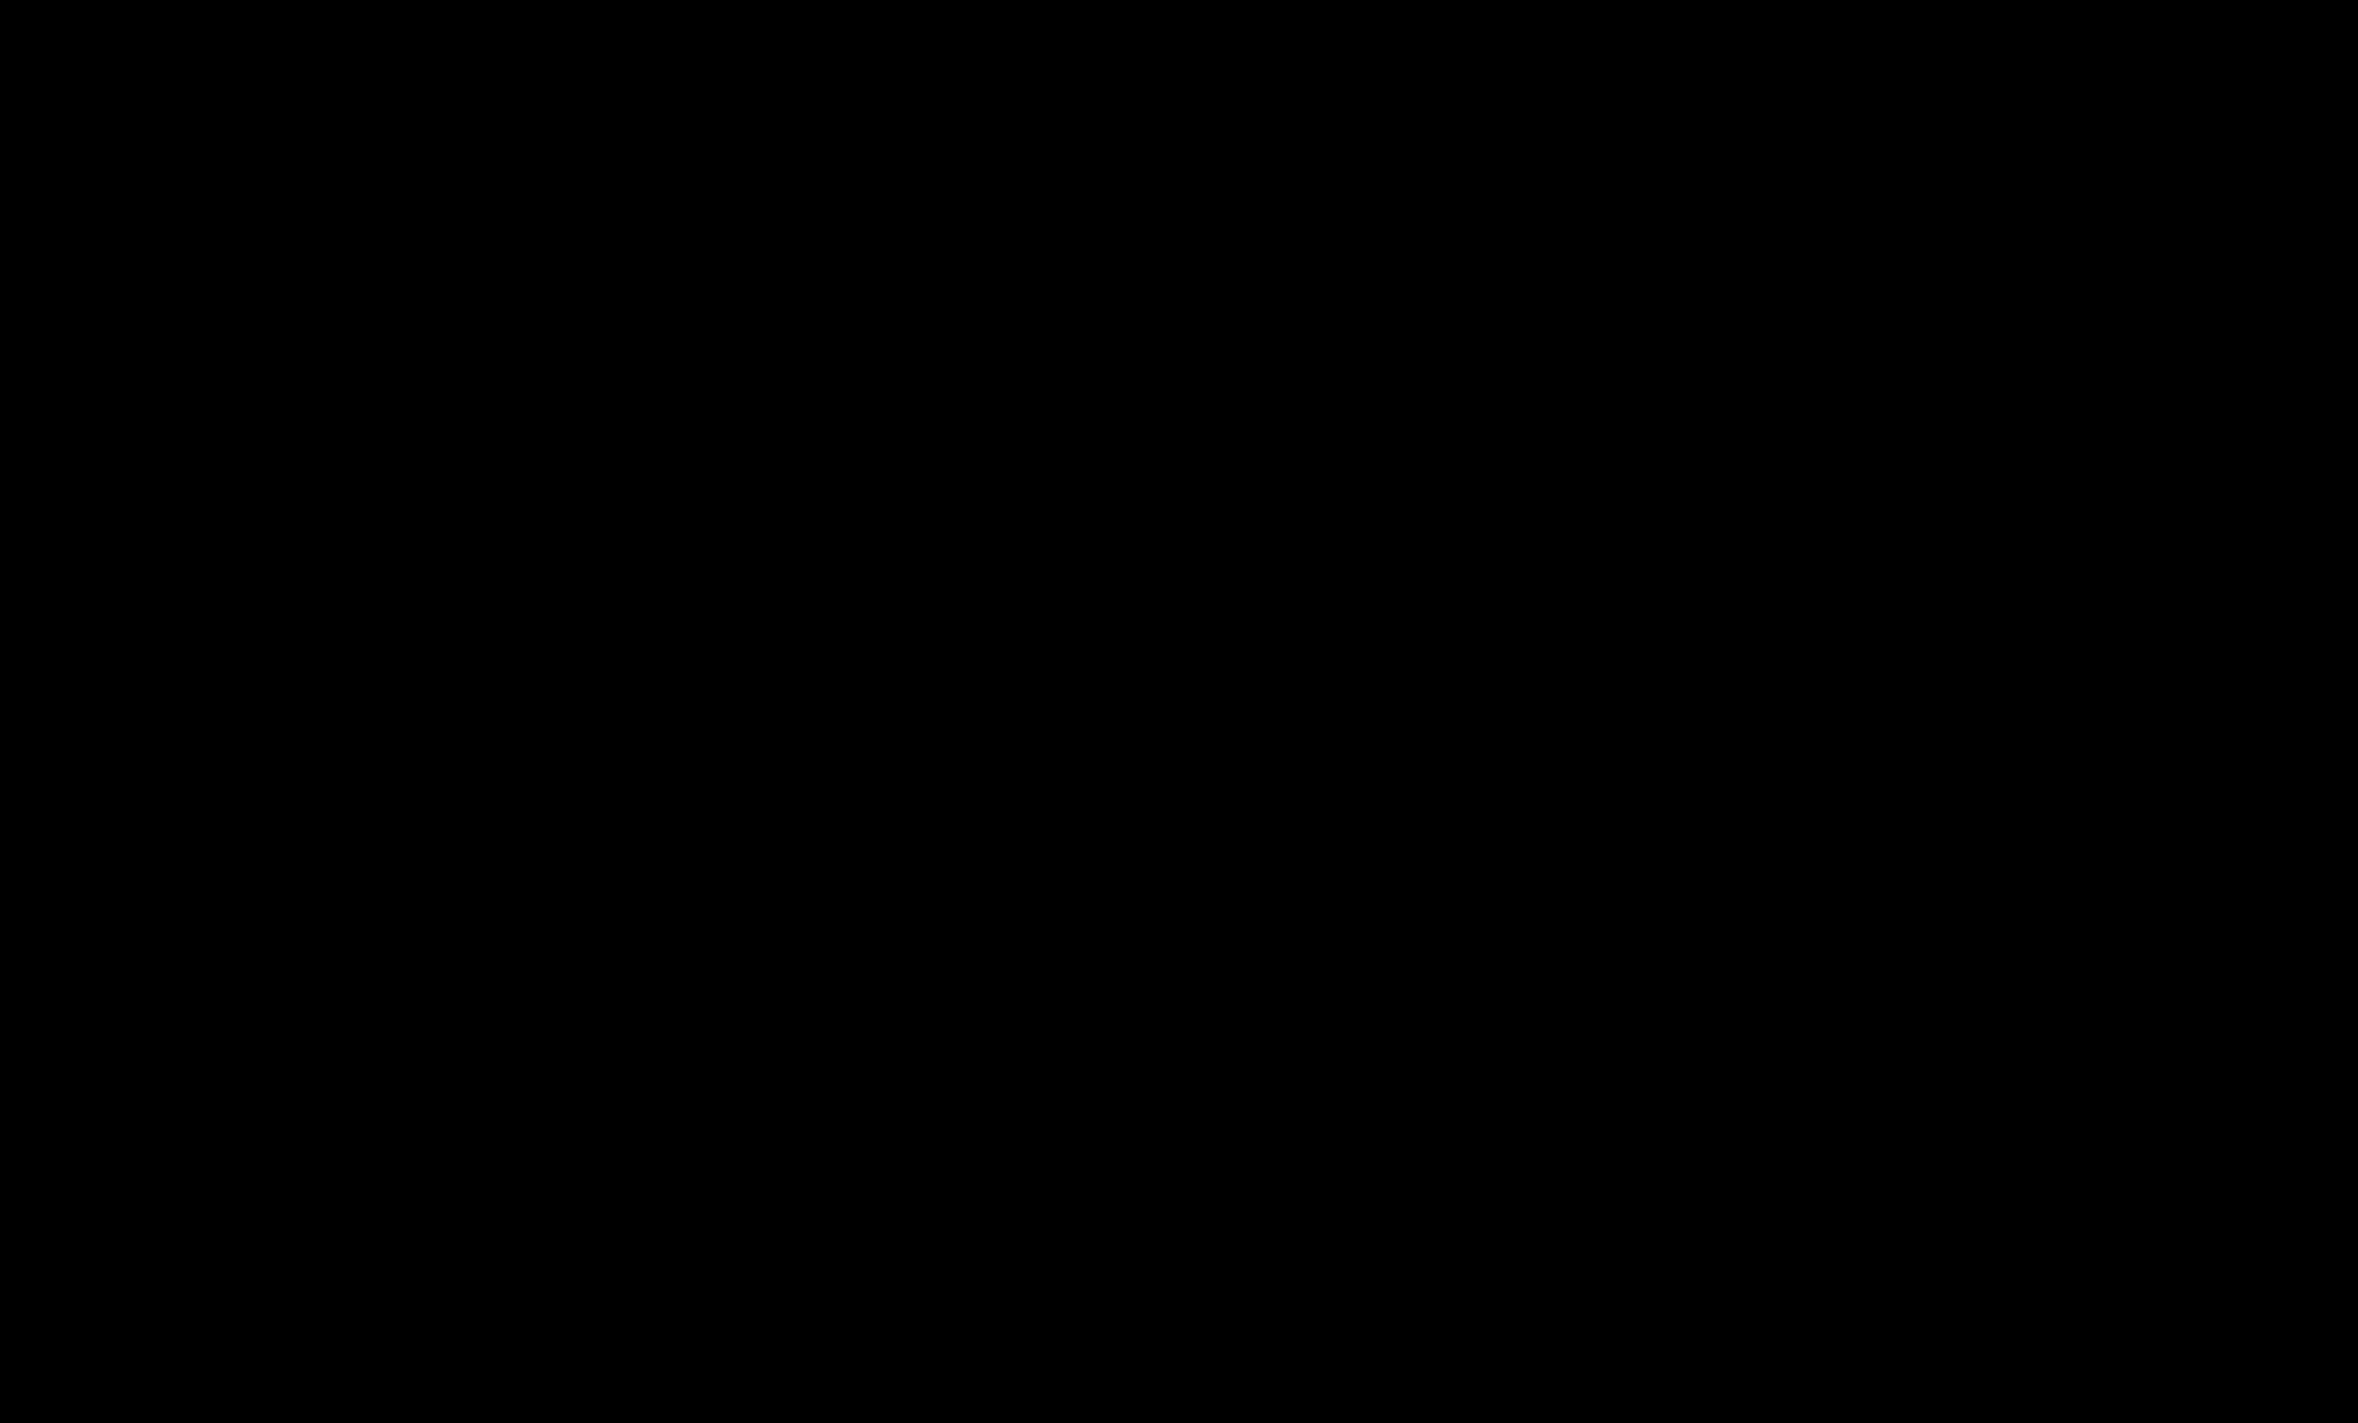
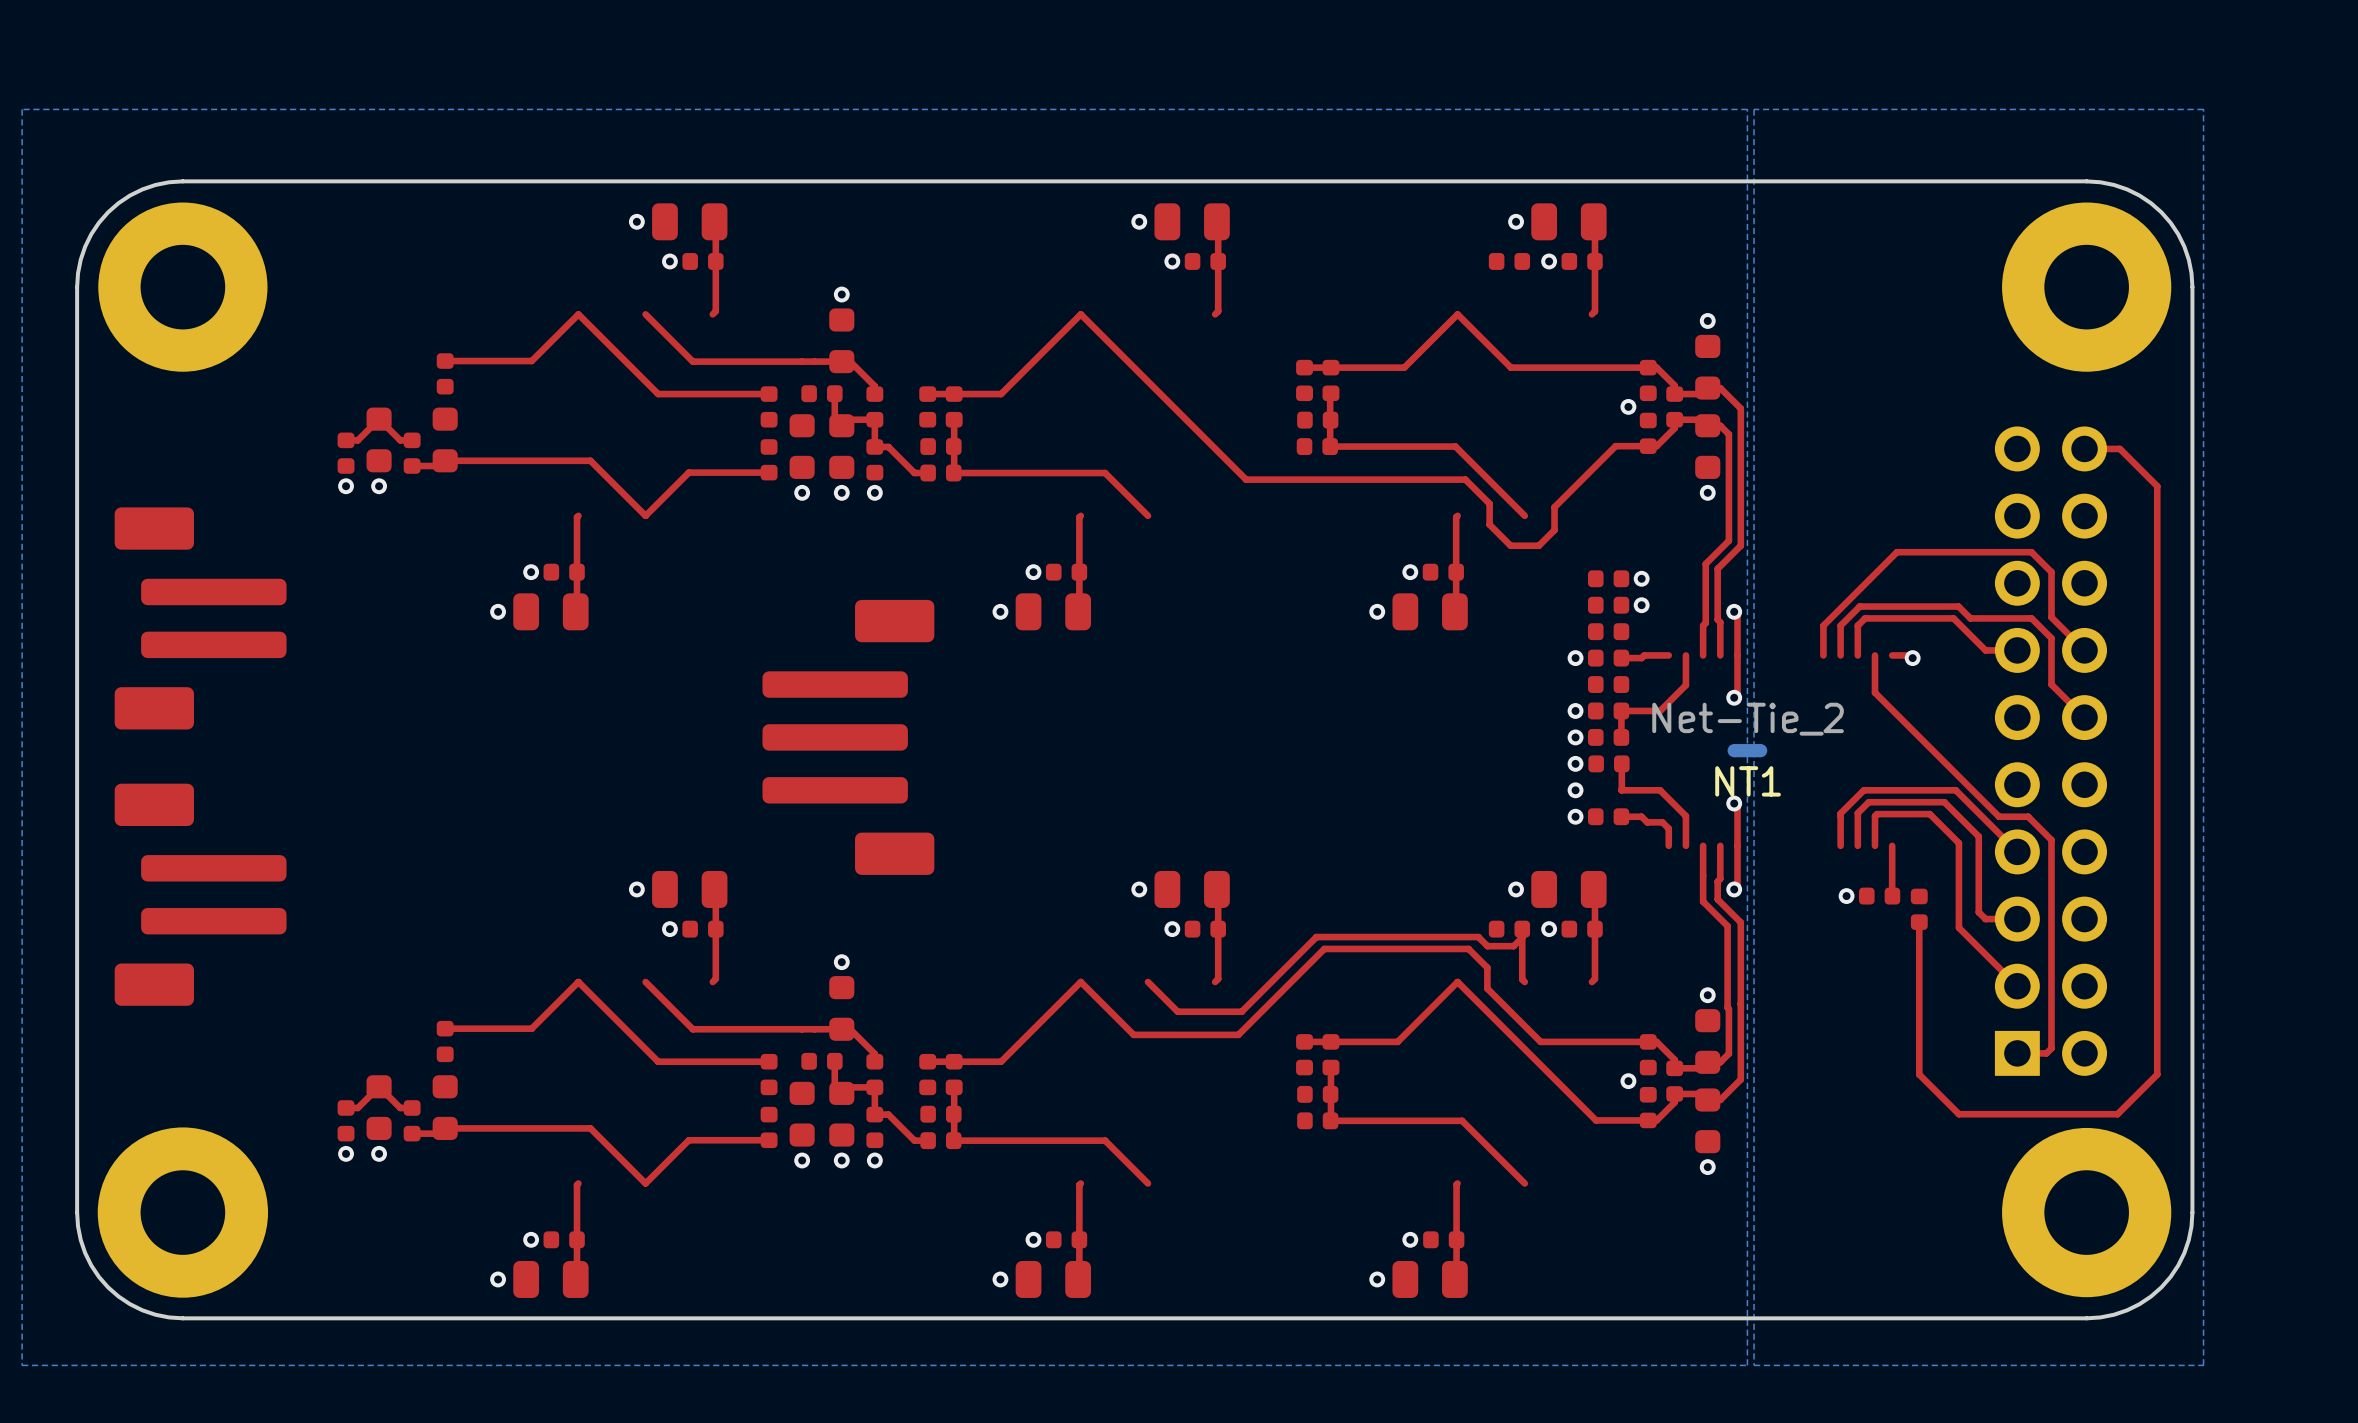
bottom zone outline: none -> (1747, 109) (22, 109) (22, 1365) (1747, 1365) (1747, 109)
bottom zone outline: none -> (2203, 109) (2203, 1365) (1754, 1365) (1754, 109) (2203, 109)
via: none -> (636, 221)
part: none -> (689, 221)
top track: none -> (714, 221) (715, 311) (712, 314)
via: none -> (1139, 221)
part: none -> (1192, 221)
top track: none -> (1216, 221) (1218, 311) (1215, 314)
via: none -> (1516, 221)
part: none -> (1568, 221)
top track: none -> (1593, 221) (1594, 311) (1591, 314)
via: none -> (669, 261)
part: none -> (702, 261)
via: none -> (1172, 261)
part: none -> (1205, 261)
part: none -> (1509, 261)
via: none -> (1549, 261)
part: none -> (1582, 261)
via: none -> (841, 294)
top track: none -> (645, 314) (692, 361) (850, 361) (874, 386) (874, 394)
via: none -> (1707, 320)
part: none -> (841, 340)
top track: none -> (445, 361) (531, 361) (578, 314) (658, 394) (769, 394)
top track: none -> (1304, 367) (1404, 367) (1457, 314) (1510, 367) (1656, 367) (1674, 385) (1674, 394) (1701, 394) (1707, 388) (1720, 388) (1740, 408) (1740, 545) (1717, 568) (1717, 619) (1720, 622) (1720, 655)
part: none -> (1707, 367)
part: none -> (445, 373)
part: none -> (1304, 380)
part: none -> (1330, 380)
part: none -> (1648, 380)
part: none -> (821, 393)
top track: none -> (834, 393) (834, 418) (841, 425) (847, 419) (874, 419) (874, 446) (888, 446) (914, 473) (928, 473)
top track: none -> (1330, 393) (1330, 446) (1455, 446) (1524, 515)
top track: none -> (927, 394) (1001, 394) (1080, 314) (1246, 479) (1465, 479) (1489, 503) (1489, 524) (1510, 545) (1538, 545) (1554, 530) (1554, 507) (1615, 446) (1656, 446) (1674, 428) (1674, 419) (1701, 419) (1707, 425) (1720, 425) (1728, 434) (1728, 540) (1705, 563) (1705, 623) (1703, 625) (1703, 655)
part: none -> (769, 406)
part: none -> (874, 406)
part: none -> (927, 406)
part: none -> (954, 406)
via: none -> (1628, 406)
part: none -> (1674, 406)
top track: none -> (954, 419) (953, 473) (1105, 473) (1147, 515)
part: none -> (1317, 420)
part: none -> (1648, 433)
part: none -> (379, 439)
part: none -> (445, 439)
top track: none -> (412, 440) (400, 440) (379, 419) (357, 440) (346, 440)
part: none -> (802, 446)
part: none -> (841, 446)
part: none -> (940, 446)
part: none -> (1317, 446)
part: none -> (1707, 446)
top track: none -> (2084, 448) (2119, 448) (2157, 486) (2157, 1074) (2117, 1114) (1958, 1114) (1919, 1074) (1919, 922)
part: none -> (346, 453)
part: none -> (412, 453)
part: none -> (769, 459)
part: none -> (874, 459)
top track: none -> (412, 466) (439, 466) (445, 460) (590, 460) (645, 515) (688, 472) (769, 472)
part: none -> (940, 473)
via: none -> (346, 486)
via: none -> (379, 486)
via: none -> (802, 492)
via: none -> (841, 492)
via: none -> (874, 492)
via: none -> (1707, 492)
top track: none -> (578, 515) (575, 611)
top track: none -> (1080, 515) (1078, 611)
top track: none -> (1457, 515) (1454, 611)
via: none -> (531, 572)
part: none -> (564, 572)
via: none -> (1033, 572)
part: none -> (1066, 572)
via: none -> (1410, 572)
part: none -> (1443, 572)
part: none -> (1608, 578)
via: none -> (1641, 578)
part: none -> (1608, 605)
via: none -> (1641, 605)
via: none -> (498, 611)
part: none -> (550, 611)
via: none -> (1000, 611)
part: none -> (1053, 611)
via: none -> (1377, 611)
part: none -> (1430, 611)
top track: none -> (1734, 611) (1737, 615) (1737, 694) (1734, 697)
via: none -> (1734, 611)
part: none -> (200, 618)
part: none -> (1608, 631)
top track: none -> (2017, 650) (1985, 650) (1953, 618) (1865, 618) (1857, 625) (1857, 655)
top track: none -> (2084, 650) (2051, 617) (2051, 572) (2031, 552) (1896, 552) (1823, 625) (1823, 655)
top track: none -> (1668, 655) (1621, 658)
top track: none -> (1685, 655) (1685, 685) (1660, 710) (1621, 710) (1621, 737)
top track: none -> (1840, 655) (1840, 625) (1859, 606) (1958, 606) (1970, 618) (2031, 618) (2051, 638) (2051, 684) (2084, 717)
top track: none -> (1875, 655) (1875, 692) (1999, 816) (2028, 816) (2051, 840) (2051, 1048) (2046, 1053) (2017, 1053)
top track: none -> (1892, 655) (1910, 655) (1912, 658)
via: none -> (1575, 658)
part: none -> (1608, 658)
via: none -> (1912, 658)
part: none -> (1608, 684)
via: none -> (1734, 697)
via: none -> (1575, 710)
part: none -> (1608, 710)
part: none -> (848, 737)
via: none -> (1575, 737)
part: none -> (1608, 737)
part: none -> (1134, 749)
NT1: none -> Net-Tie_2 (1747, 750)
part: none -> (2050, 751)
via: none -> (1575, 763)
part: none -> (1609, 763)
top track: none -> (1621, 763) (1621, 790) (1660, 790) (1685, 816) (1685, 845)
via: none -> (1575, 790)
top track: none -> (1734, 803) (1737, 806) (1737, 886) (1734, 889)
via: none -> (1734, 803)
via: none -> (1575, 816)
part: none -> (1608, 816)
top track: none -> (1621, 816) (1641, 816) (1647, 822) (1662, 822) (1668, 828) (1668, 845)
top track: none -> (1703, 845) (1703, 901) (1727, 926) (1728, 1053) (1720, 1062) (1707, 1062) (1701, 1068) (1674, 1068) (1674, 1059) (1656, 1041) (1540, 1041) (1487, 988) (1487, 967) (1468, 948) (1324, 948) (1238, 1034) (1133, 1034) (1080, 982) (1001, 1061) (927, 1061)
top track: none -> (1720, 845) (1720, 878) (1717, 881) (1717, 899) (1740, 922) (1740, 1079) (1720, 1100) (1707, 1100) (1701, 1093) (1674, 1093) (1674, 1102) (1656, 1120) (1596, 1120) (1457, 982) (1397, 1041) (1304, 1041)
top track: none -> (1840, 845) (1840, 813) (1863, 790) (1955, 790) (2017, 851)
top track: none -> (1857, 845) (1857, 813) (1868, 802) (1944, 802) (1978, 836) (1978, 912) (1985, 919) (2017, 919)
top track: none -> (1875, 845) (1875, 816) (1876, 814) (1929, 814) (1958, 843) (1958, 927) (2017, 986)
top track: none -> (1892, 845) (1892, 895)
via: none -> (636, 889)
part: none -> (689, 889)
top track: none -> (714, 889) (715, 978) (712, 982)
via: none -> (1139, 889)
part: none -> (1192, 889)
top track: none -> (1216, 889) (1218, 978) (1215, 982)
via: none -> (1516, 889)
part: none -> (1568, 889)
top track: none -> (1593, 889) (1594, 978) (1591, 982)
via: none -> (1734, 889)
part: none -> (200, 894)
via: none -> (1846, 896)
part: none -> (1879, 896)
part: none -> (1919, 909)
via: none -> (669, 929)
part: none -> (702, 929)
via: none -> (1172, 929)
part: none -> (1205, 929)
part: none -> (1509, 929)
top track: none -> (1522, 929) (1522, 979) (1524, 982)
via: none -> (1549, 929)
part: none -> (1582, 929)
top track: none -> (1522, 937) (1513, 946) (1487, 946) (1478, 937) (1316, 937) (1241, 1011) (1177, 1011) (1147, 982)
via: none -> (841, 962)
top track: none -> (645, 982) (692, 1029) (850, 1029) (874, 1053) (874, 1061)
via: none -> (1707, 995)
part: none -> (841, 1008)
top track: none -> (445, 1028) (531, 1028) (578, 982) (658, 1061) (769, 1061)
part: none -> (445, 1041)
part: none -> (1707, 1041)
part: none -> (1304, 1054)
part: none -> (1330, 1054)
part: none -> (1648, 1054)
part: none -> (821, 1061)
top track: none -> (834, 1061) (834, 1086) (841, 1093) (847, 1087) (874, 1087) (874, 1114) (888, 1114) (914, 1140) (928, 1140)
top track: none -> (1330, 1067) (1330, 1120) (1462, 1120) (1524, 1183)
part: none -> (769, 1074)
part: none -> (874, 1074)
part: none -> (927, 1074)
part: none -> (954, 1074)
via: none -> (1628, 1081)
part: none -> (1674, 1081)
top track: none -> (954, 1087) (953, 1140) (1105, 1140) (1147, 1183)
part: none -> (1317, 1094)
part: none -> (379, 1107)
top track: none -> (412, 1107) (400, 1107) (379, 1086) (357, 1107) (346, 1107)
part: none -> (445, 1107)
part: none -> (1648, 1107)
part: none -> (802, 1114)
part: none -> (841, 1114)
part: none -> (940, 1114)
part: none -> (346, 1120)
part: none -> (412, 1120)
part: none -> (1317, 1120)
part: none -> (1707, 1120)
part: none -> (769, 1127)
part: none -> (874, 1127)
top track: none -> (412, 1133) (439, 1133) (445, 1128) (590, 1128) (645, 1183) (688, 1140) (769, 1140)
part: none -> (940, 1140)
via: none -> (346, 1153)
via: none -> (379, 1153)
via: none -> (802, 1160)
via: none -> (841, 1160)
via: none -> (874, 1160)
via: none -> (1707, 1167)
top track: none -> (578, 1183) (575, 1279)
top track: none -> (1080, 1183) (1078, 1279)
top track: none -> (1457, 1183) (1456, 1277) (1454, 1279)
via: none -> (531, 1239)
part: none -> (564, 1239)
via: none -> (1033, 1239)
part: none -> (1066, 1239)
via: none -> (1410, 1239)
part: none -> (1443, 1239)
via: none -> (498, 1279)
part: none -> (550, 1279)
via: none -> (1000, 1279)
part: none -> (1053, 1279)
via: none -> (1377, 1279)
part: none -> (1430, 1279)

